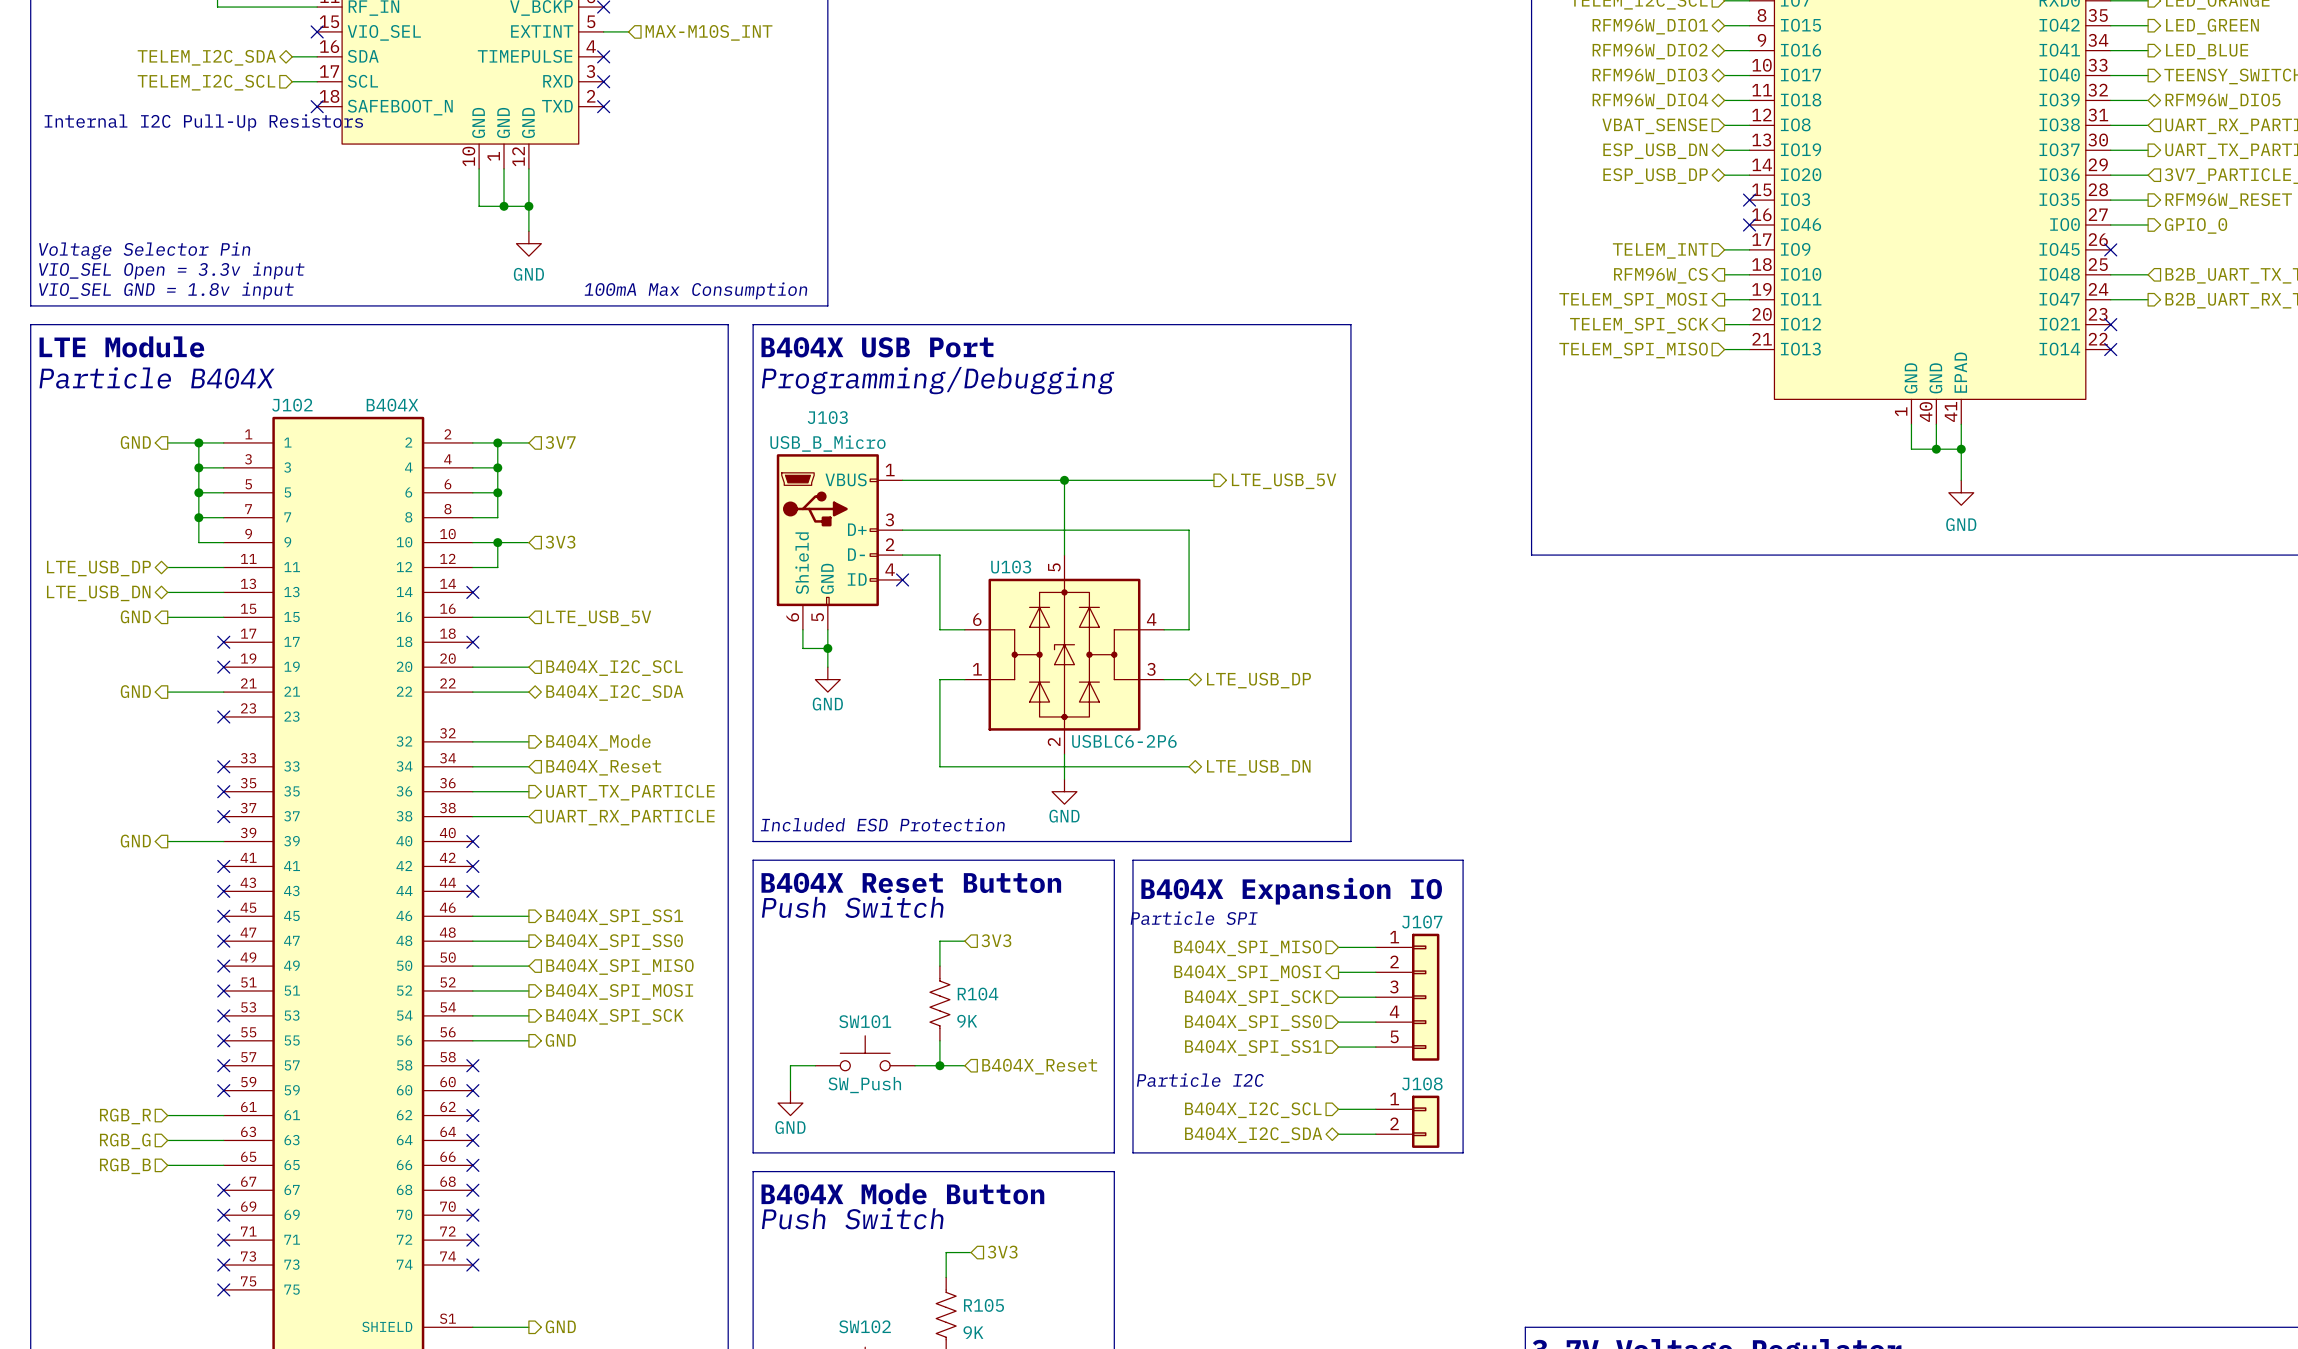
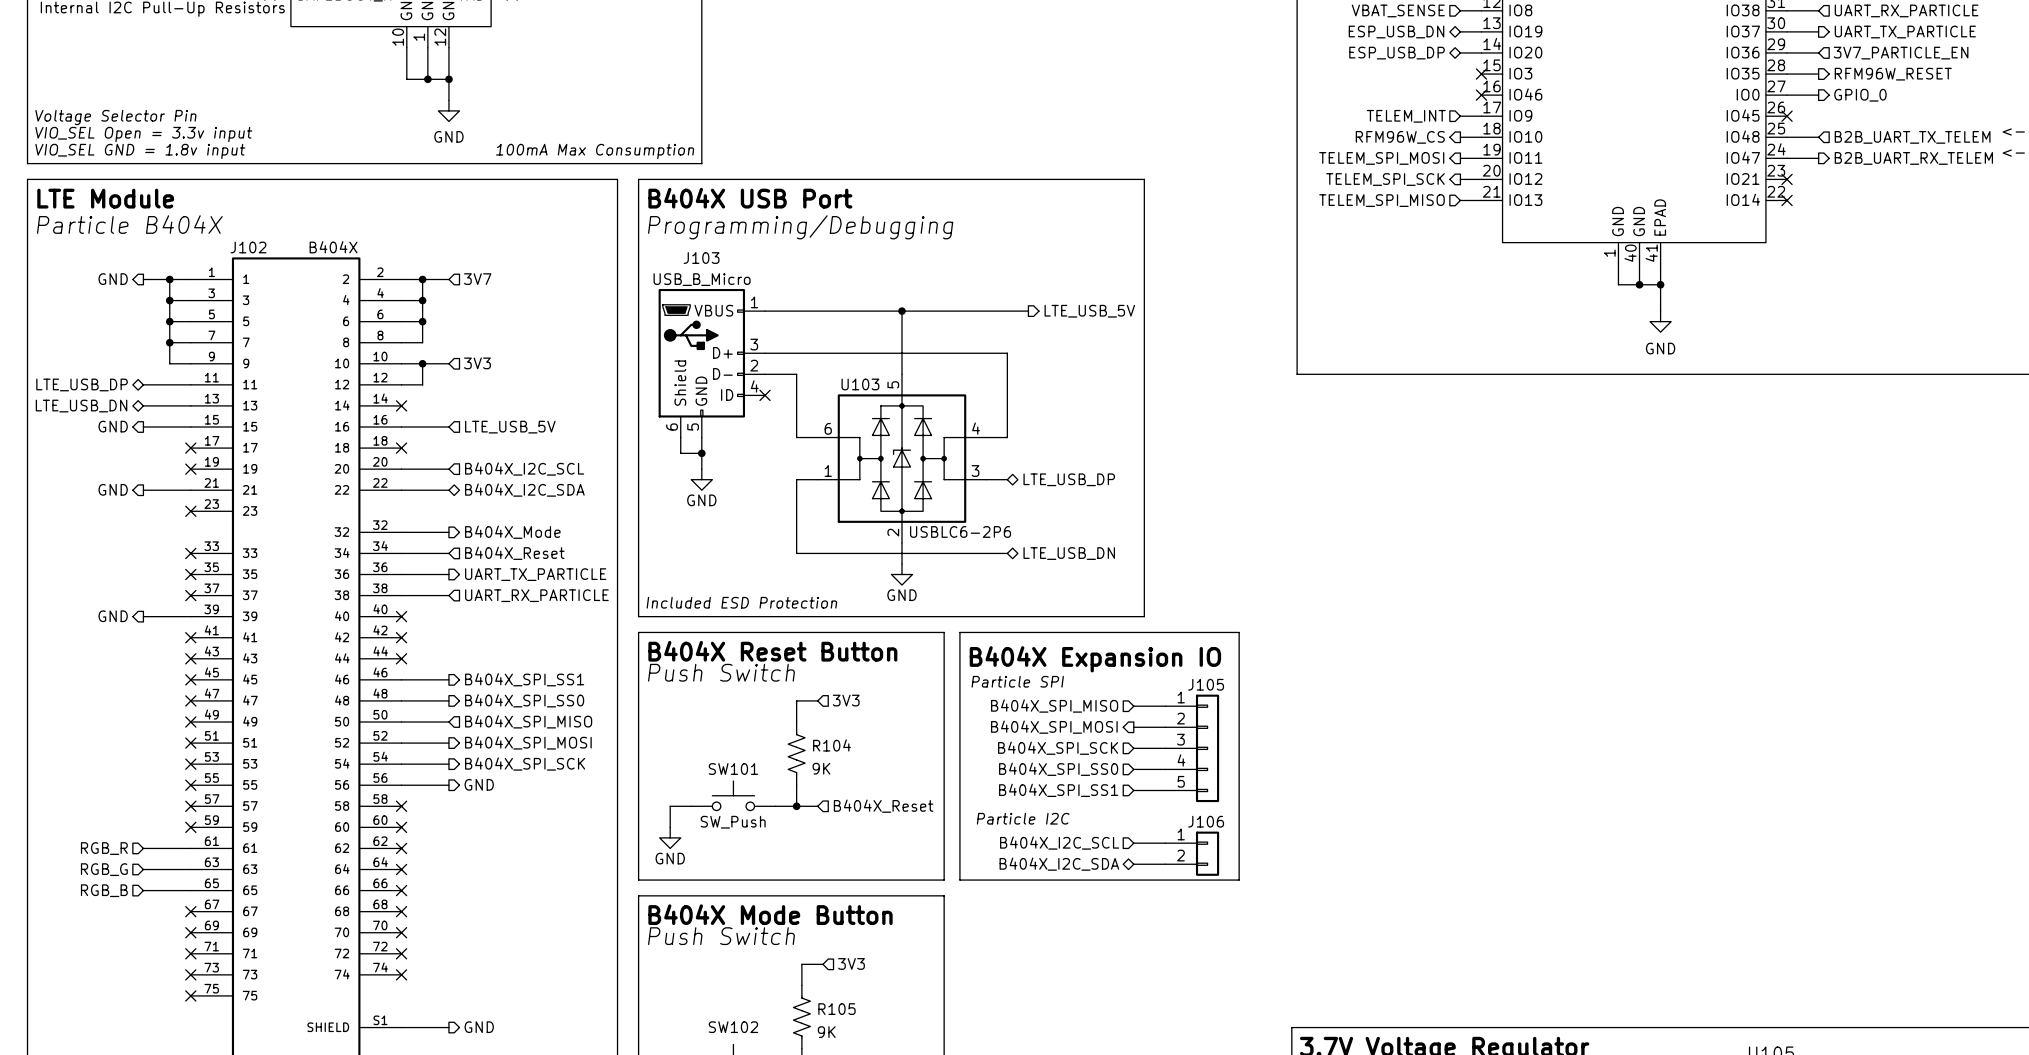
J107 name: J107 (1422, 922) -> J105 (1206, 684)
J108 name: J108 (1422, 1083) -> J106 (1206, 821)

